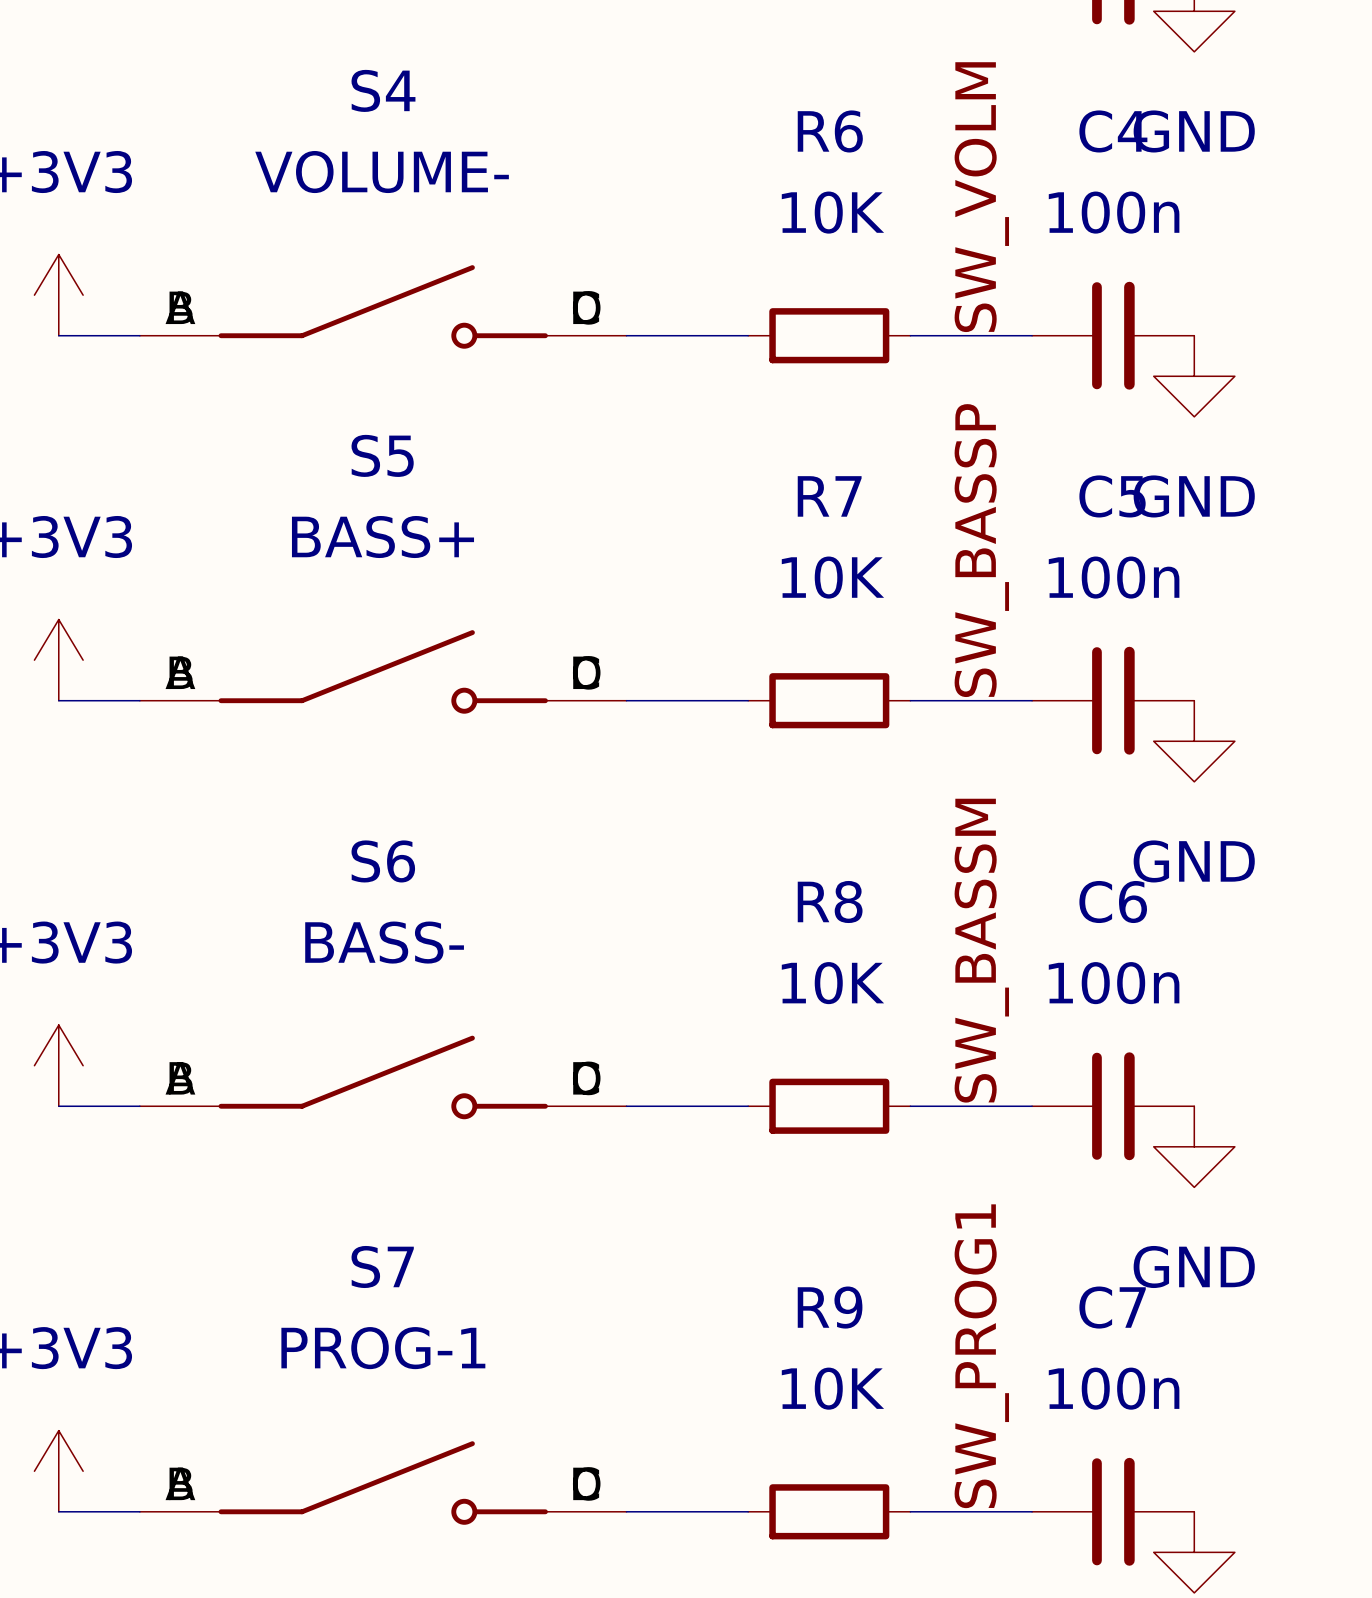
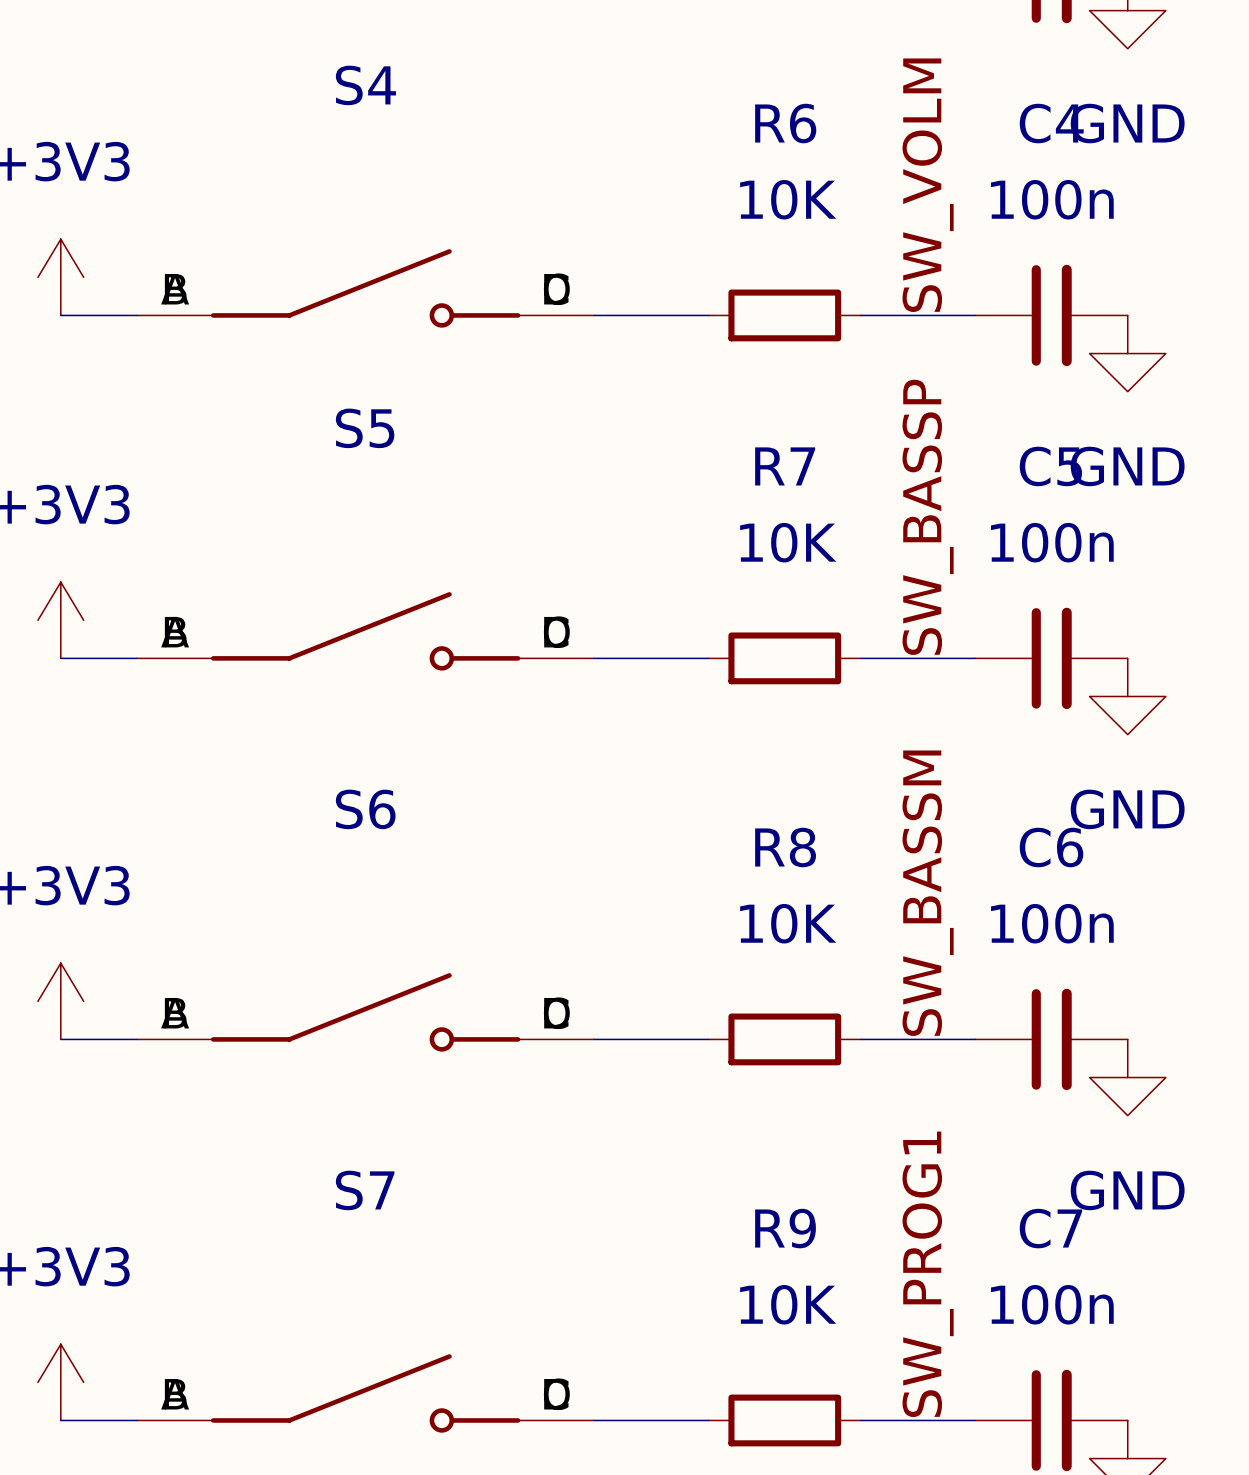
S4 value: VOLUME- (382, 172) -> none
S5 value: BASS+ (382, 537) -> none
S6 value: BASS- (384, 942) -> none
S7 value: PROG-1 (383, 1348) -> none

